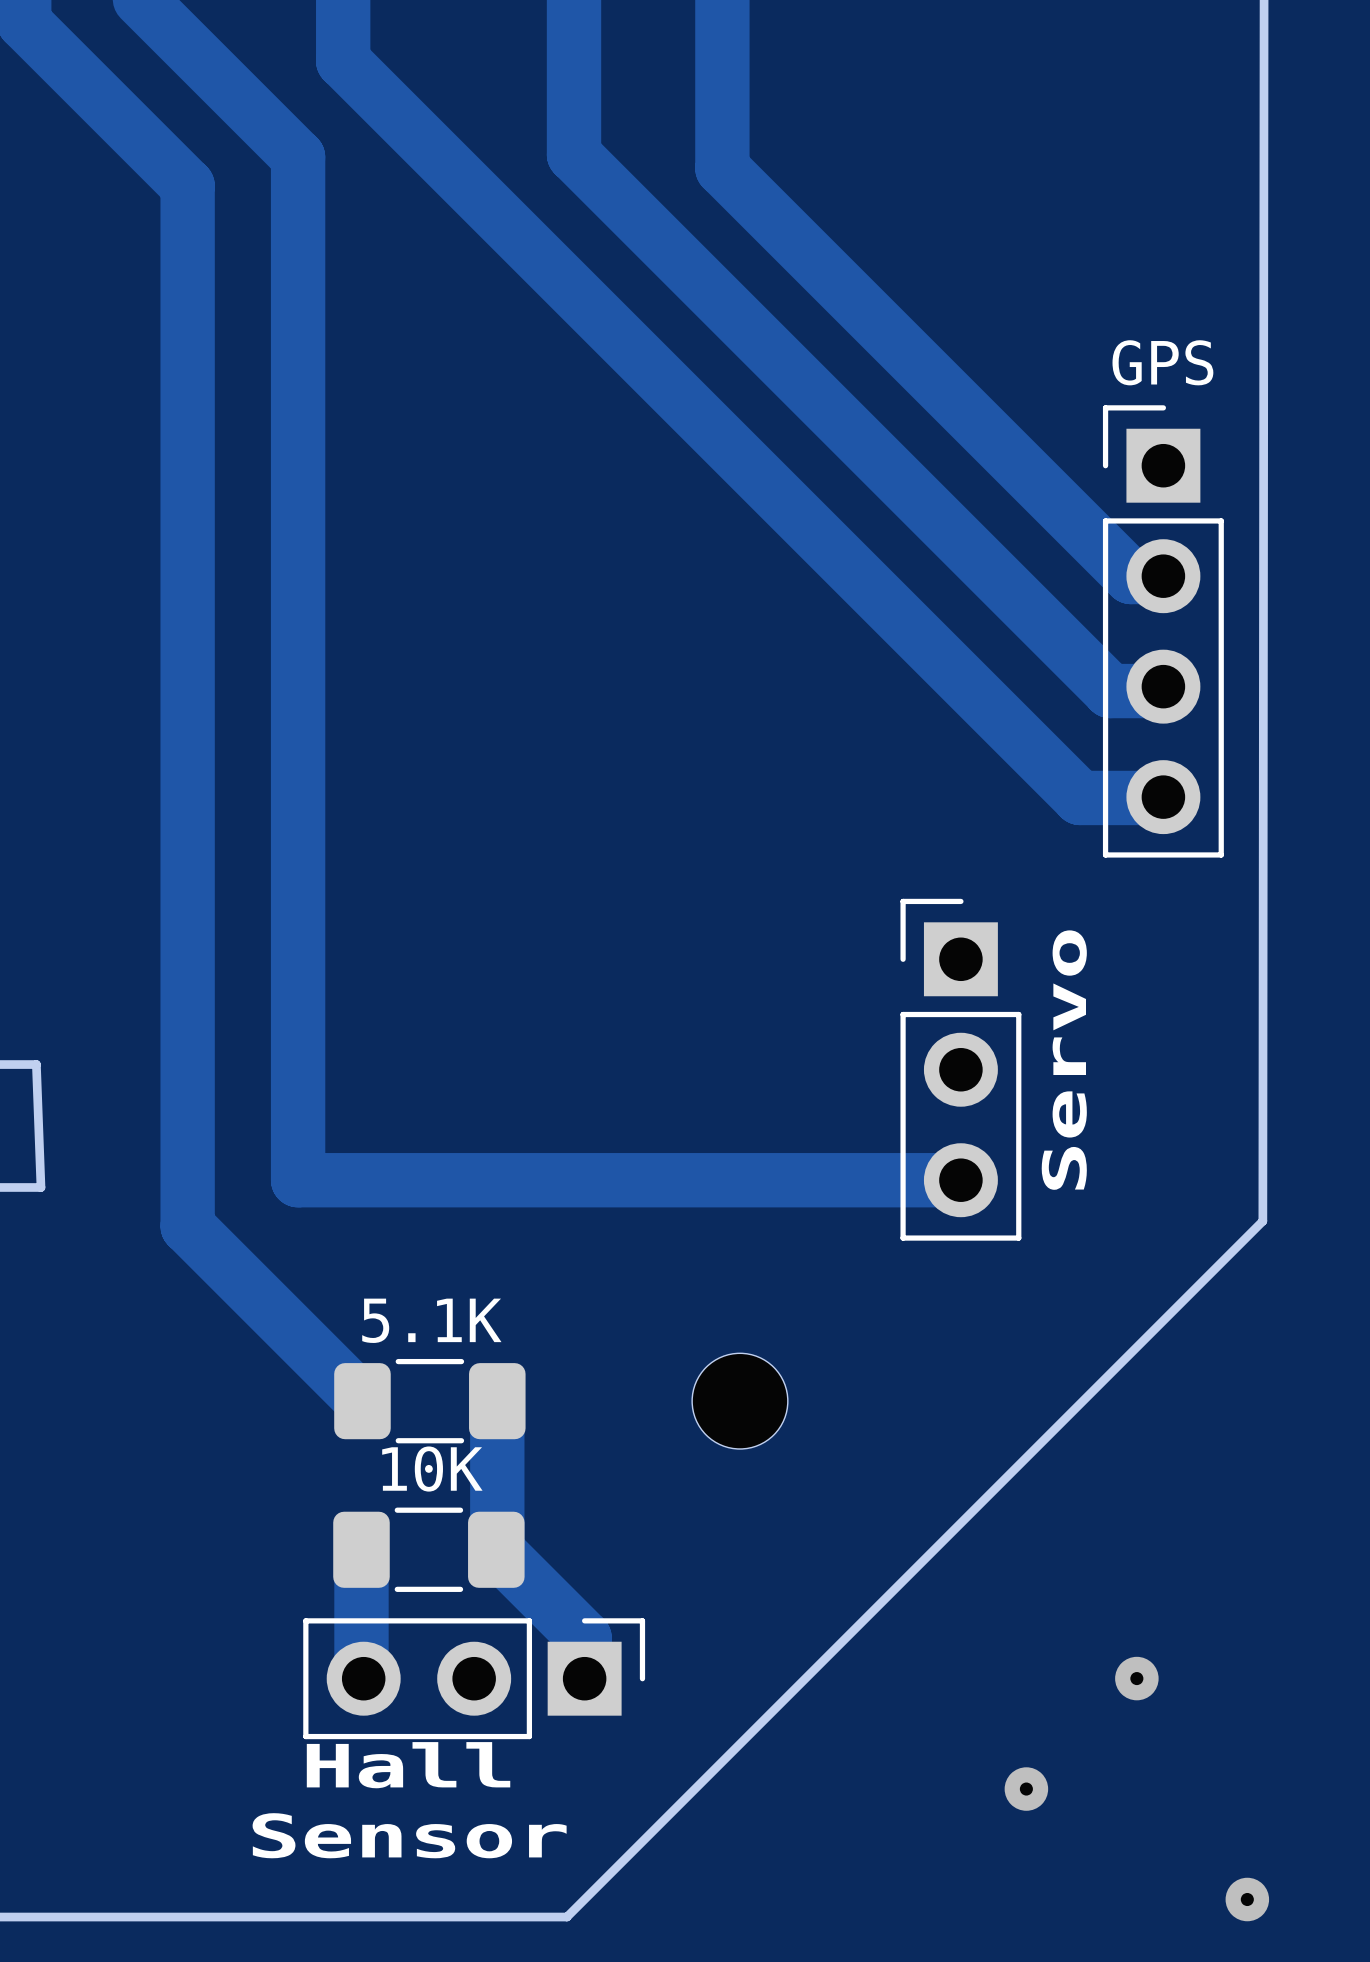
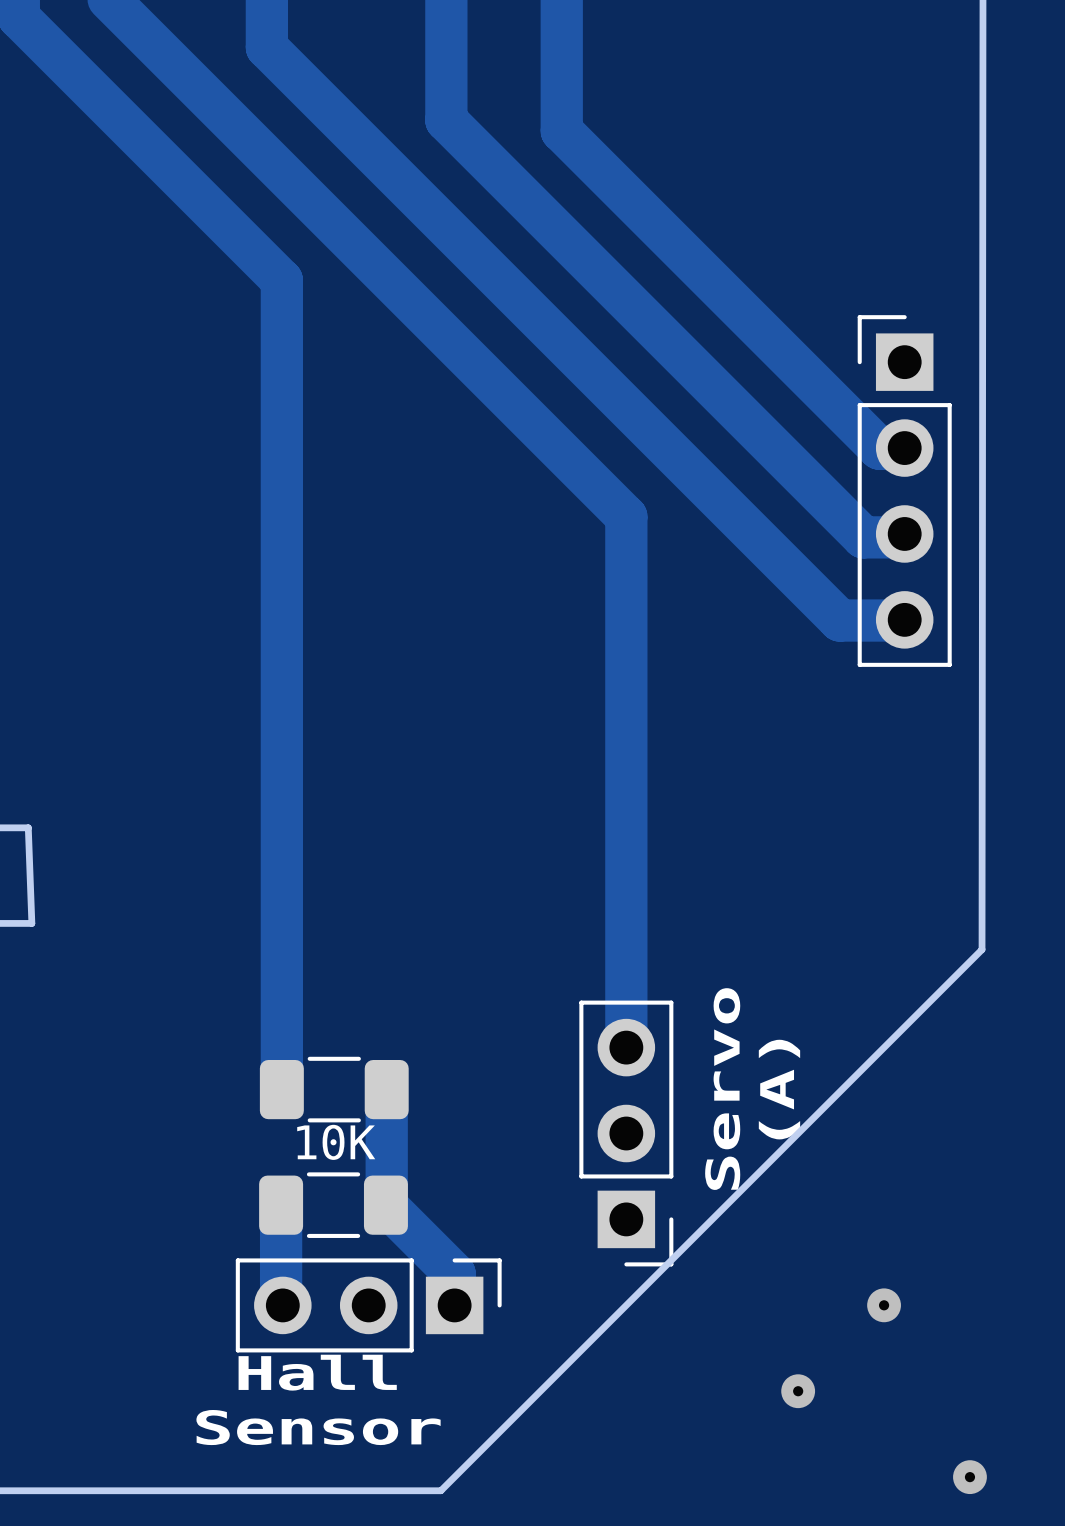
track: (298, 157) (298, 1180) (960, 1180) -> (231, 122) (626, 516) (626, 1047)
track: (187, 185) (187, 1226) (362, 1401) -> (145, 144) (281, 280) (281, 1089)
GPS name: GPS (1162, 362) -> none
text position: Servo (1064, 1060) -> Servo (722, 1089)
part rotation: 0° (960, 1069) -> 180° (626, 1133)
part position: (960, 1069) -> (626, 1133)
5.1K name: 5.1K (431, 1320) -> none
part: (739, 1401) -> none
text: none -> (A) (779, 1089)

